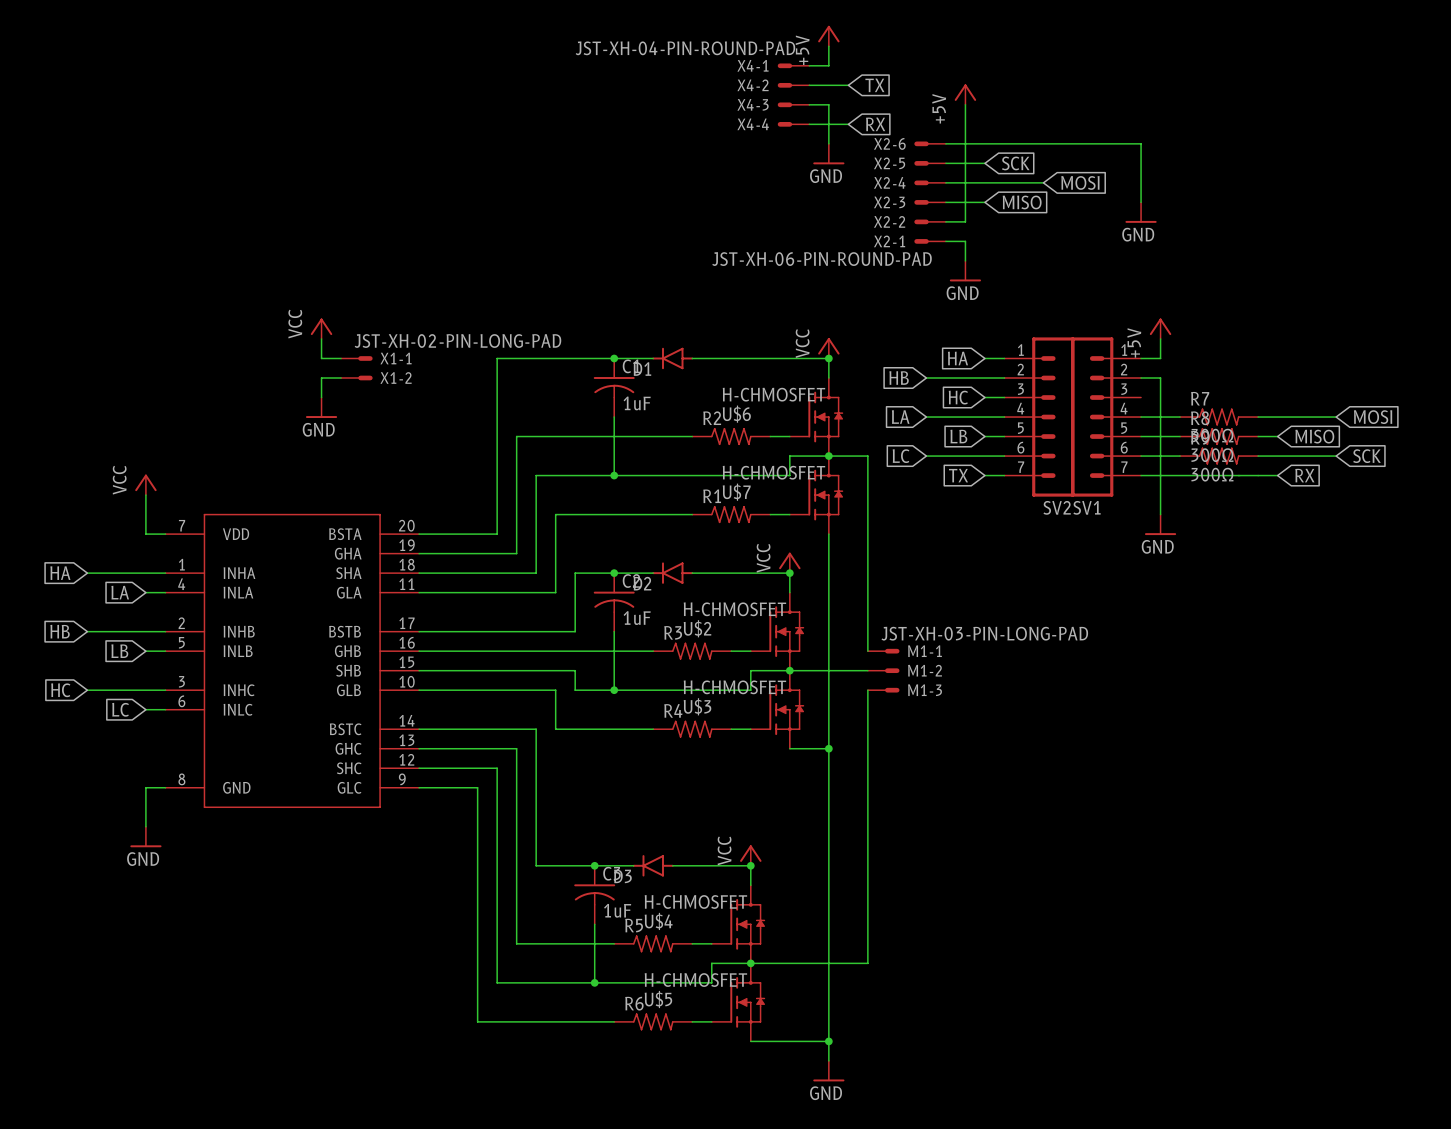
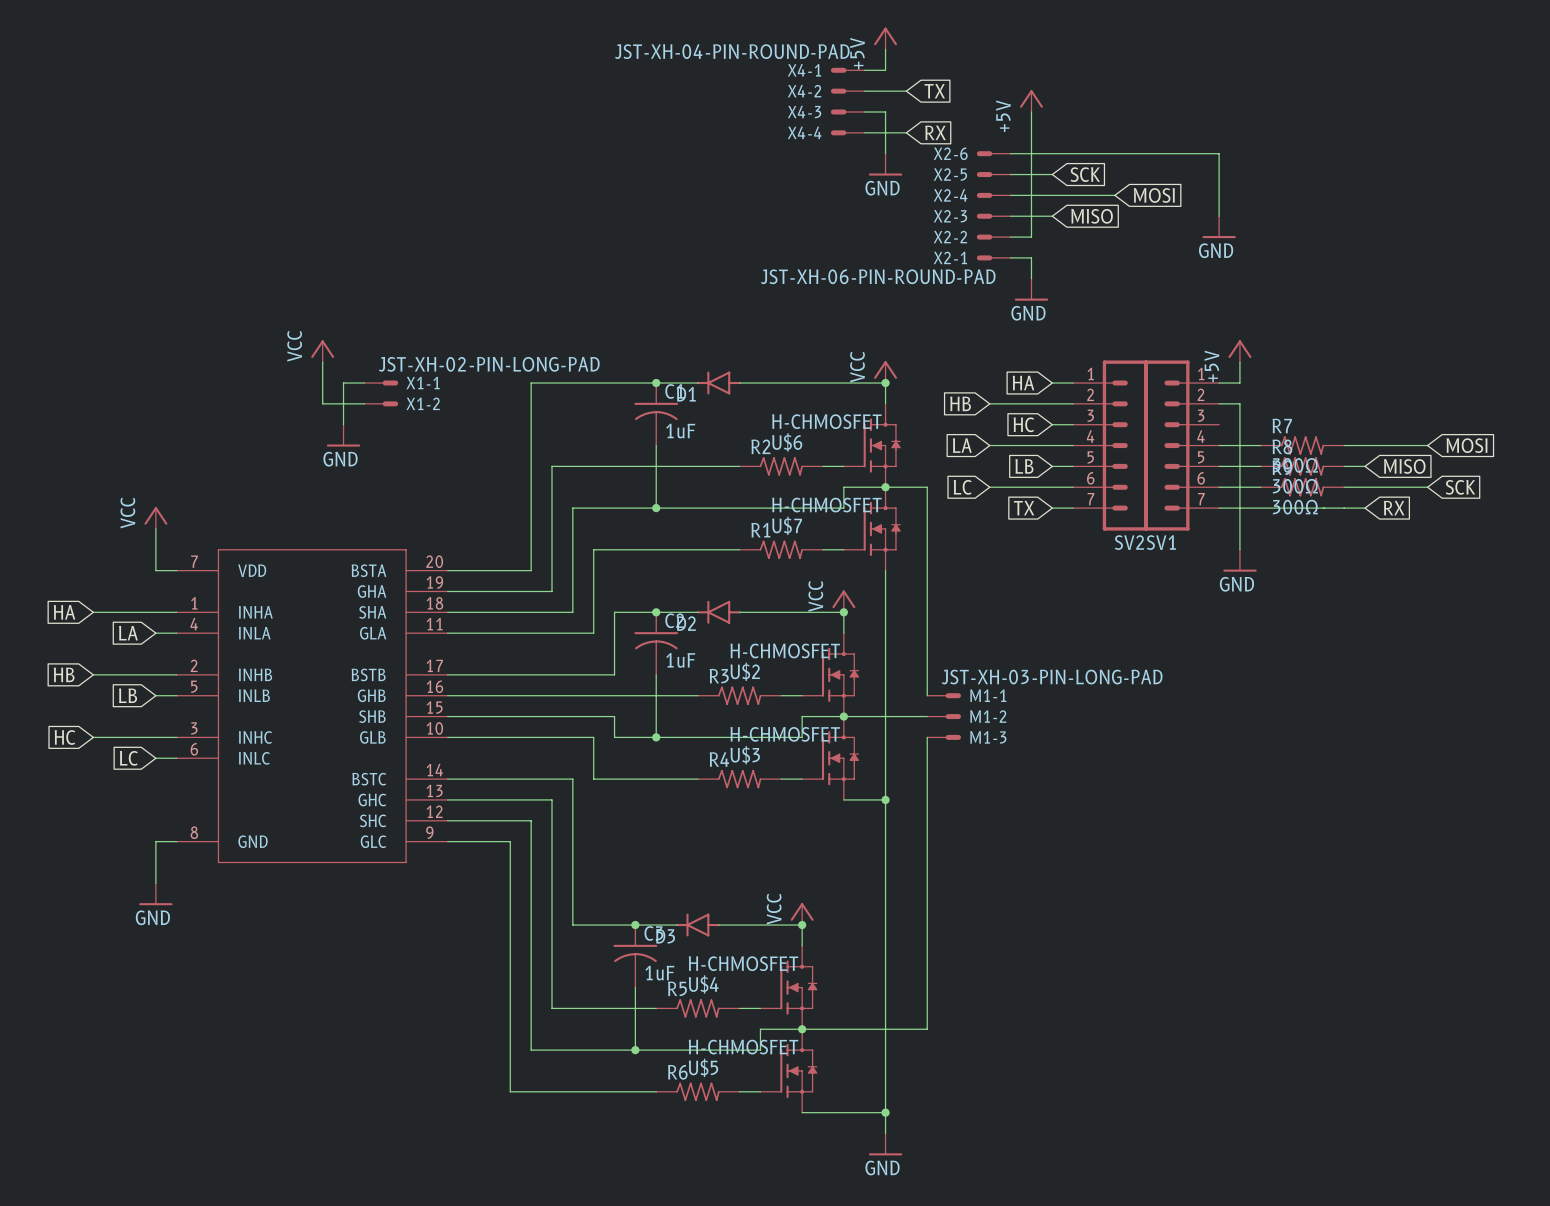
power symbol position: VCC (321, 328) -> VCC (322, 351)
wire: (321, 338) (321, 358) -> (322, 362) (322, 403) (343, 403) (343, 383)

